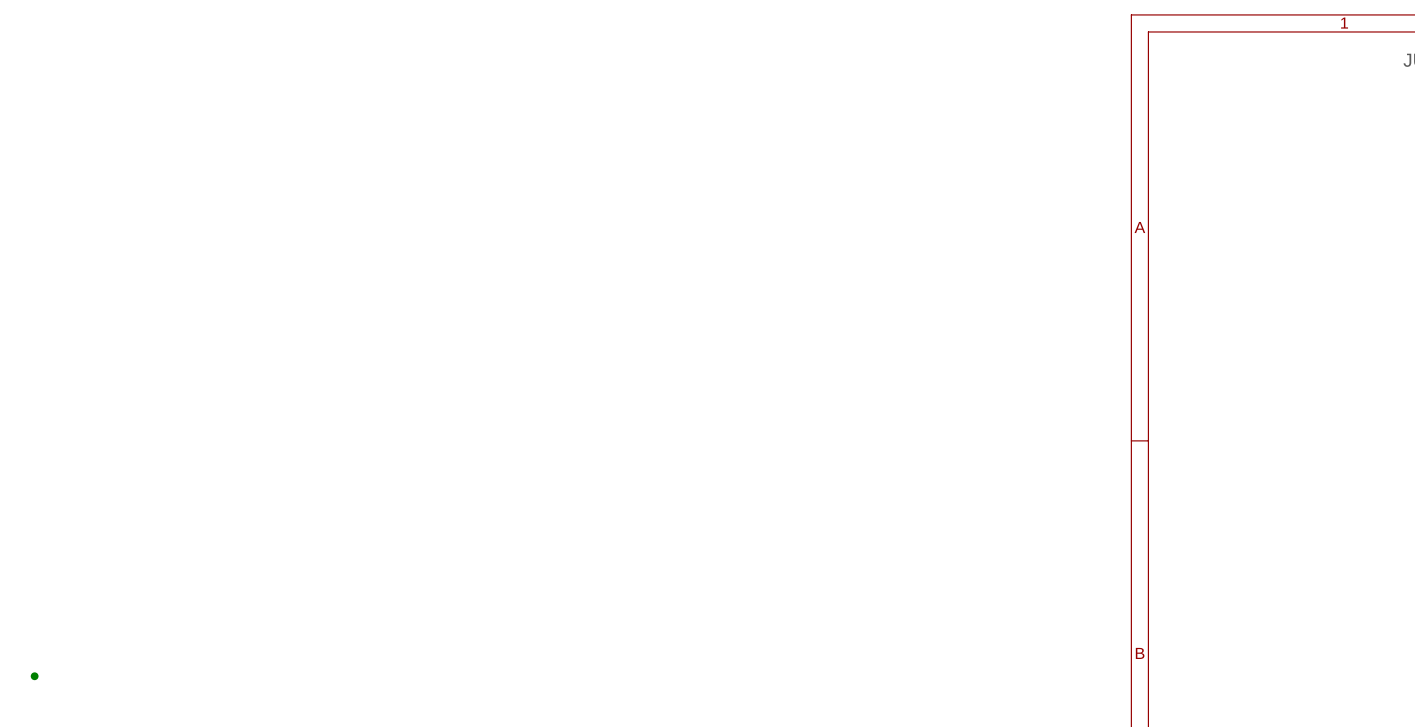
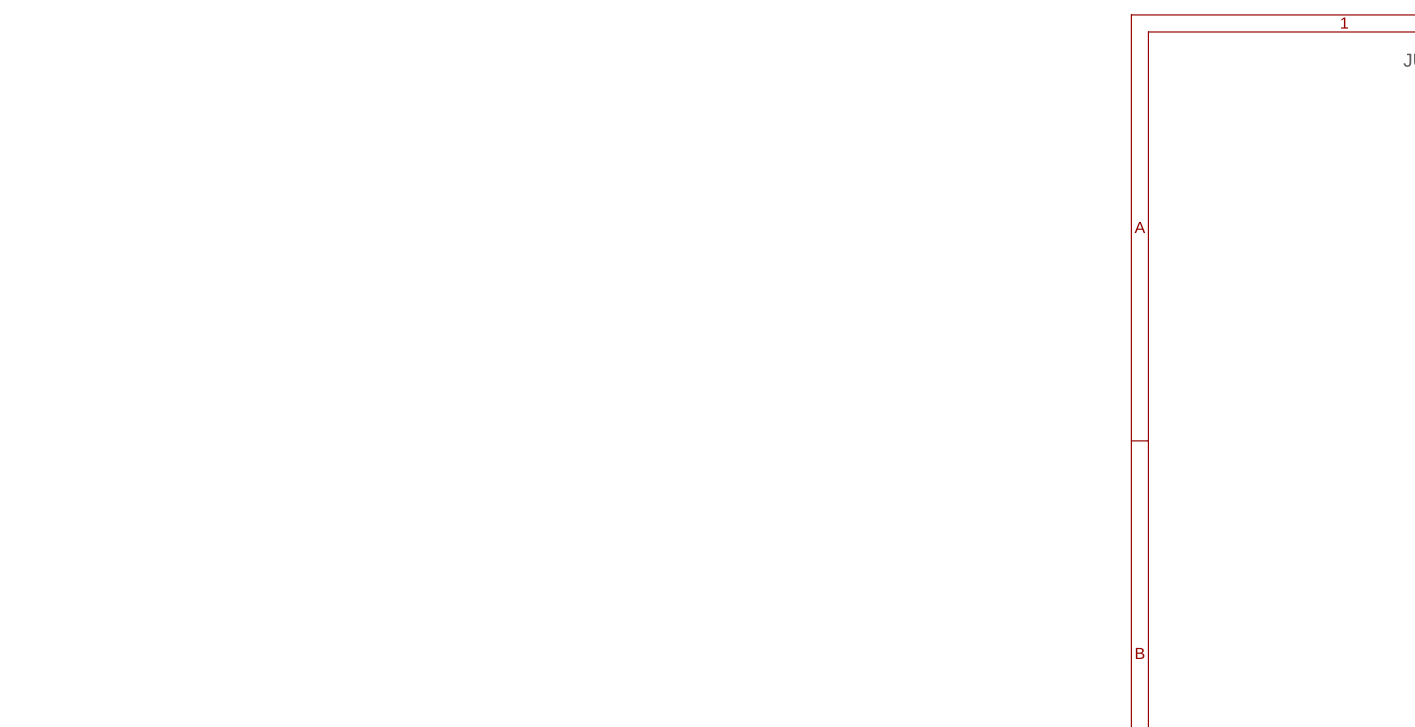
junction: (34, 676) -> none

